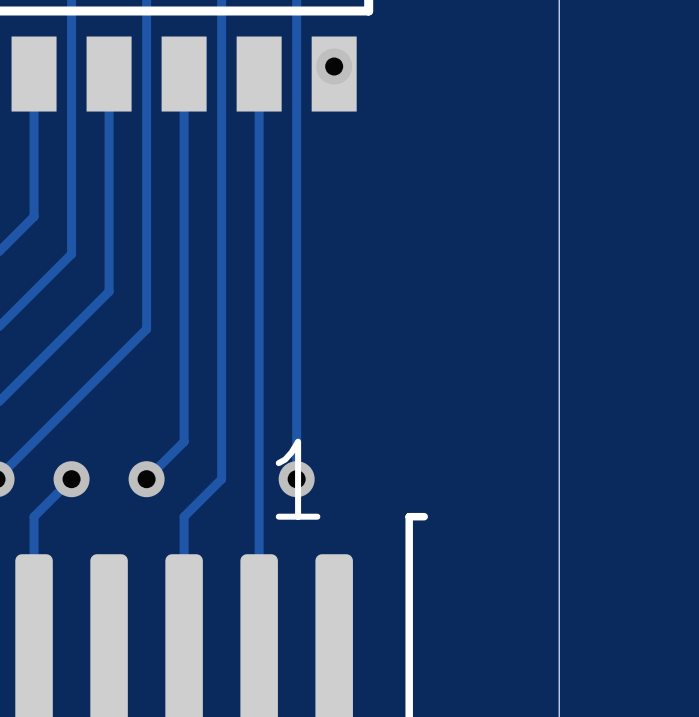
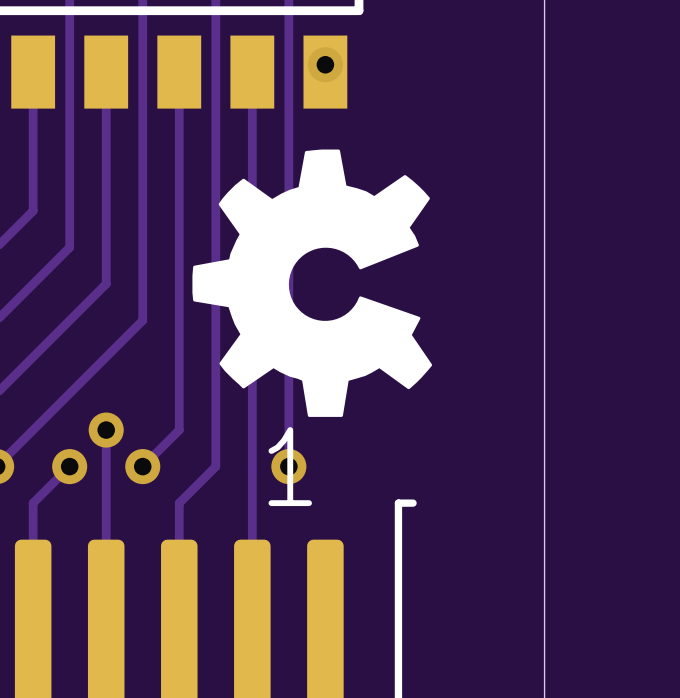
drawing: none -> [192, 149, 433, 417]
track: none -> (106, 430) (106, 649)
via: none -> (106, 430)

